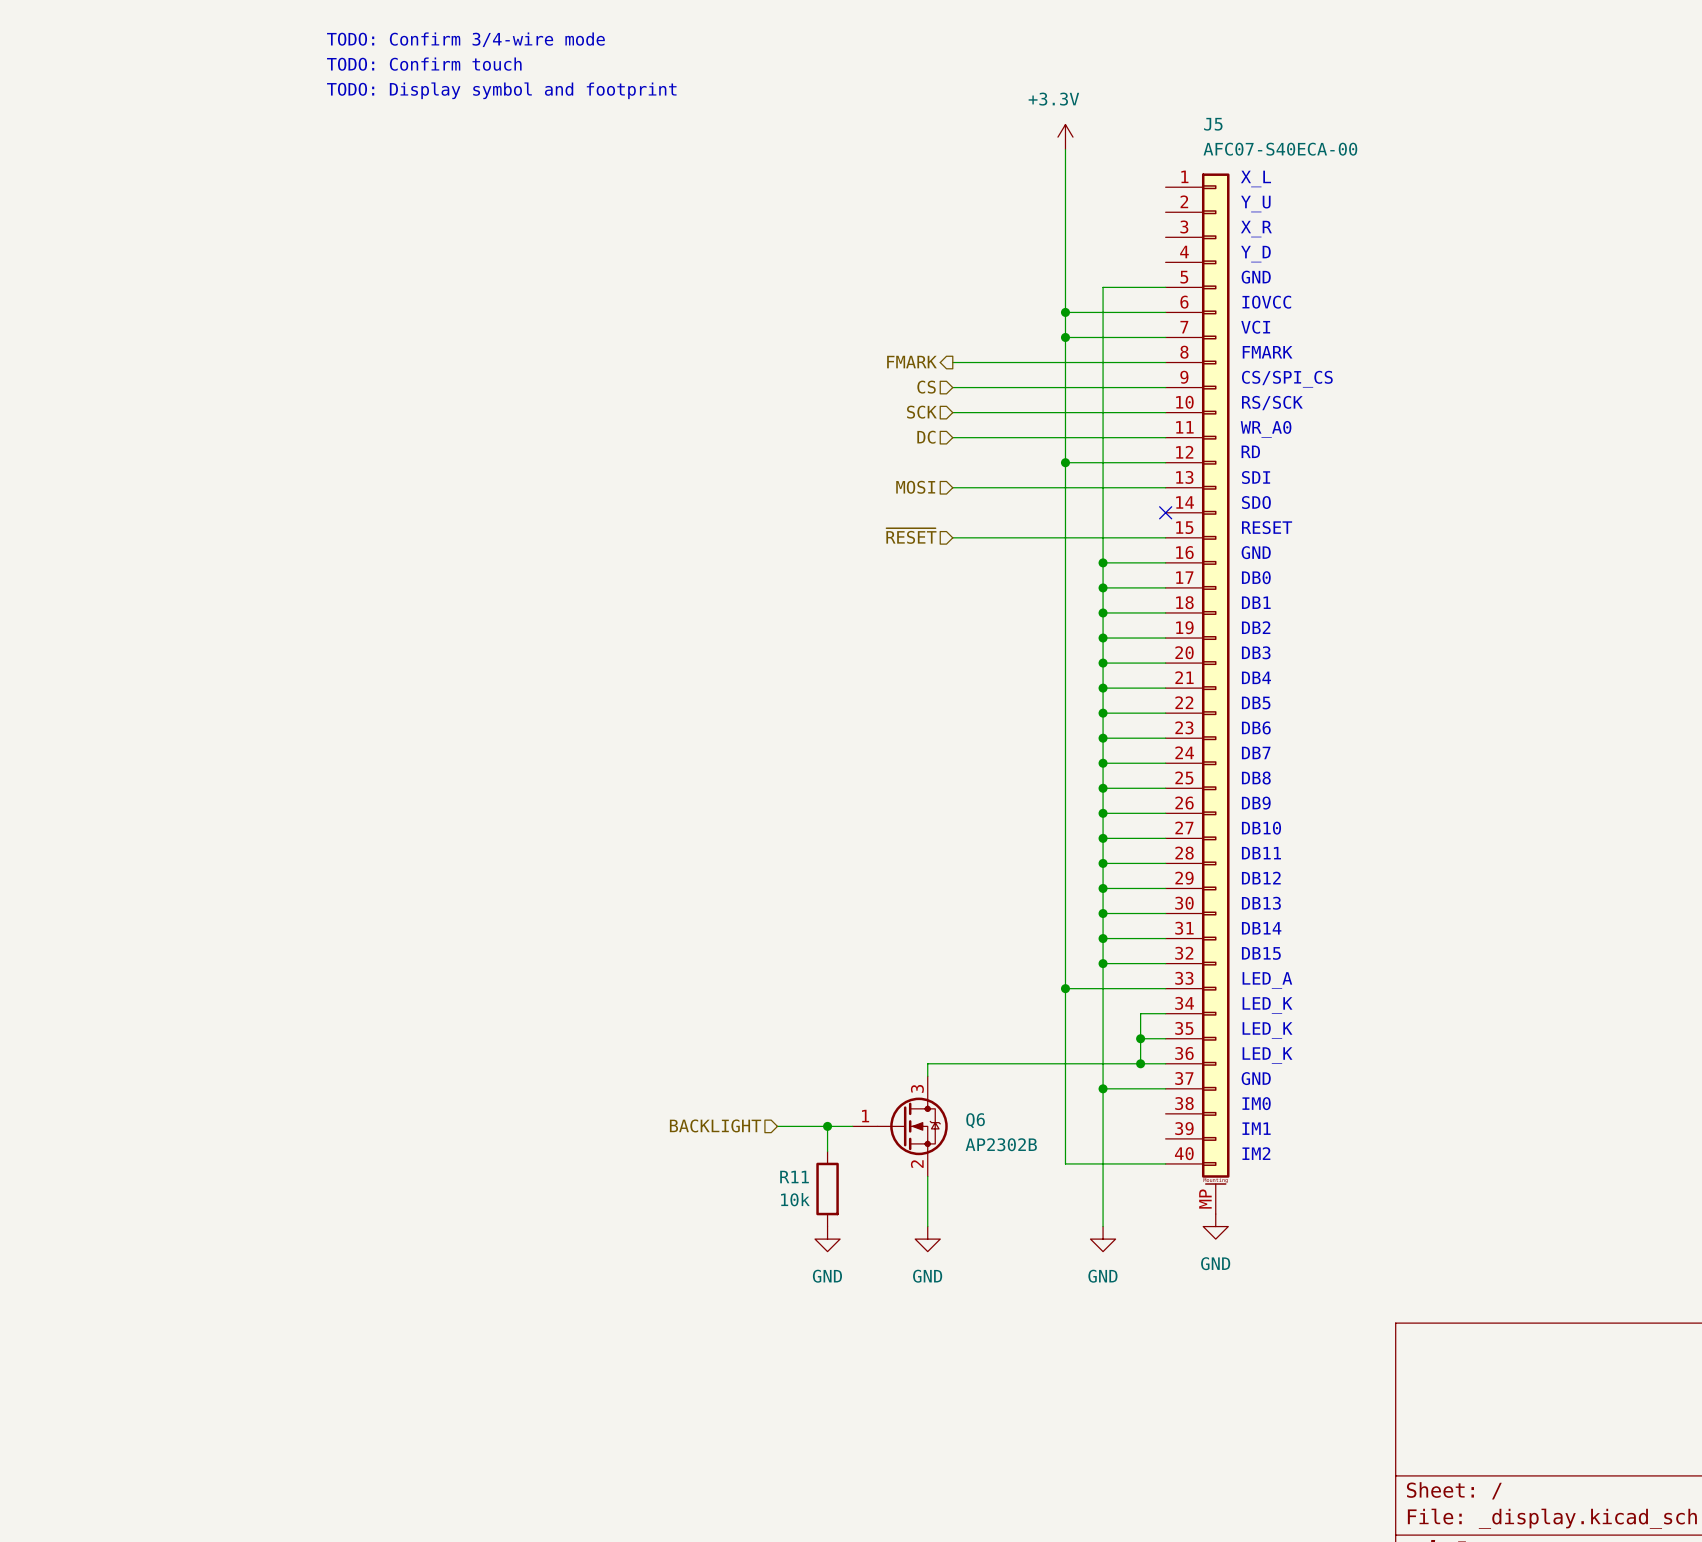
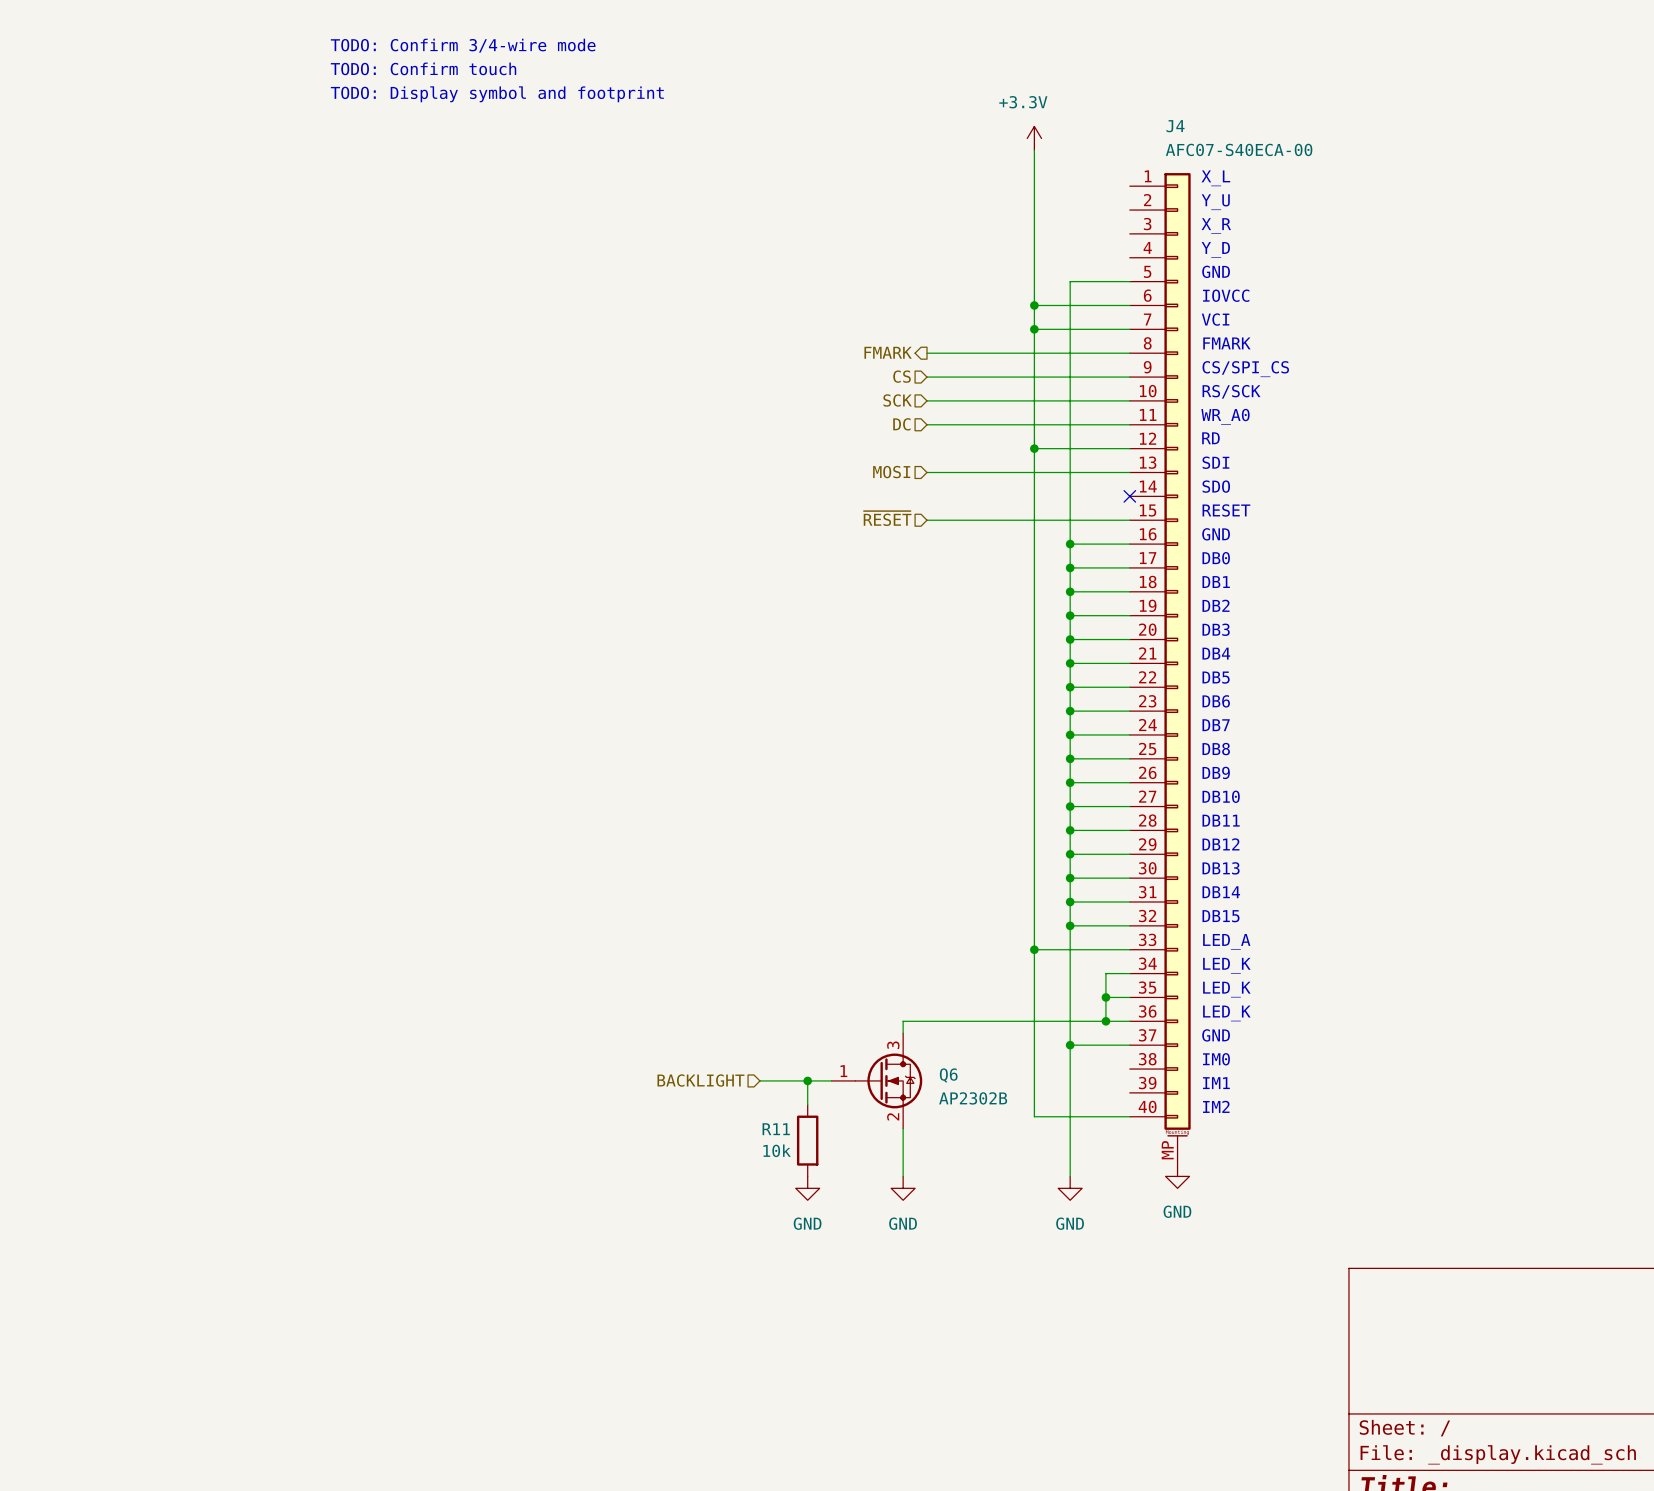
J5 name: J5 (1213, 124) -> J4 (1175, 126)

